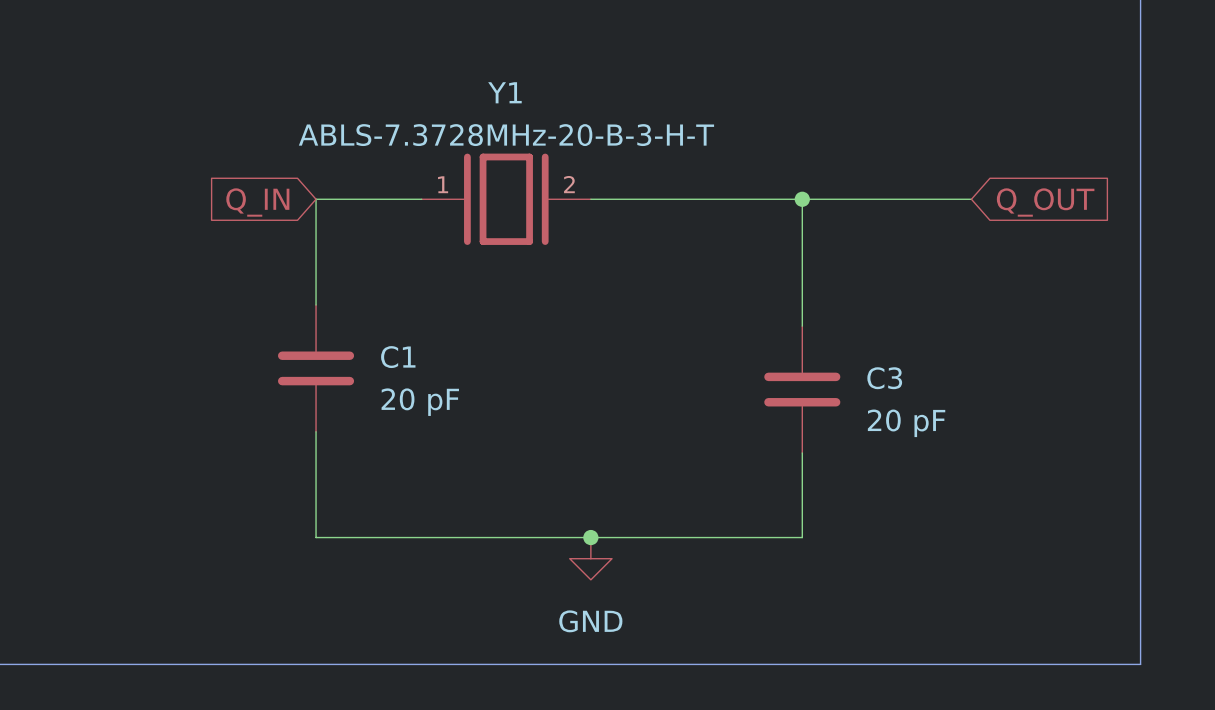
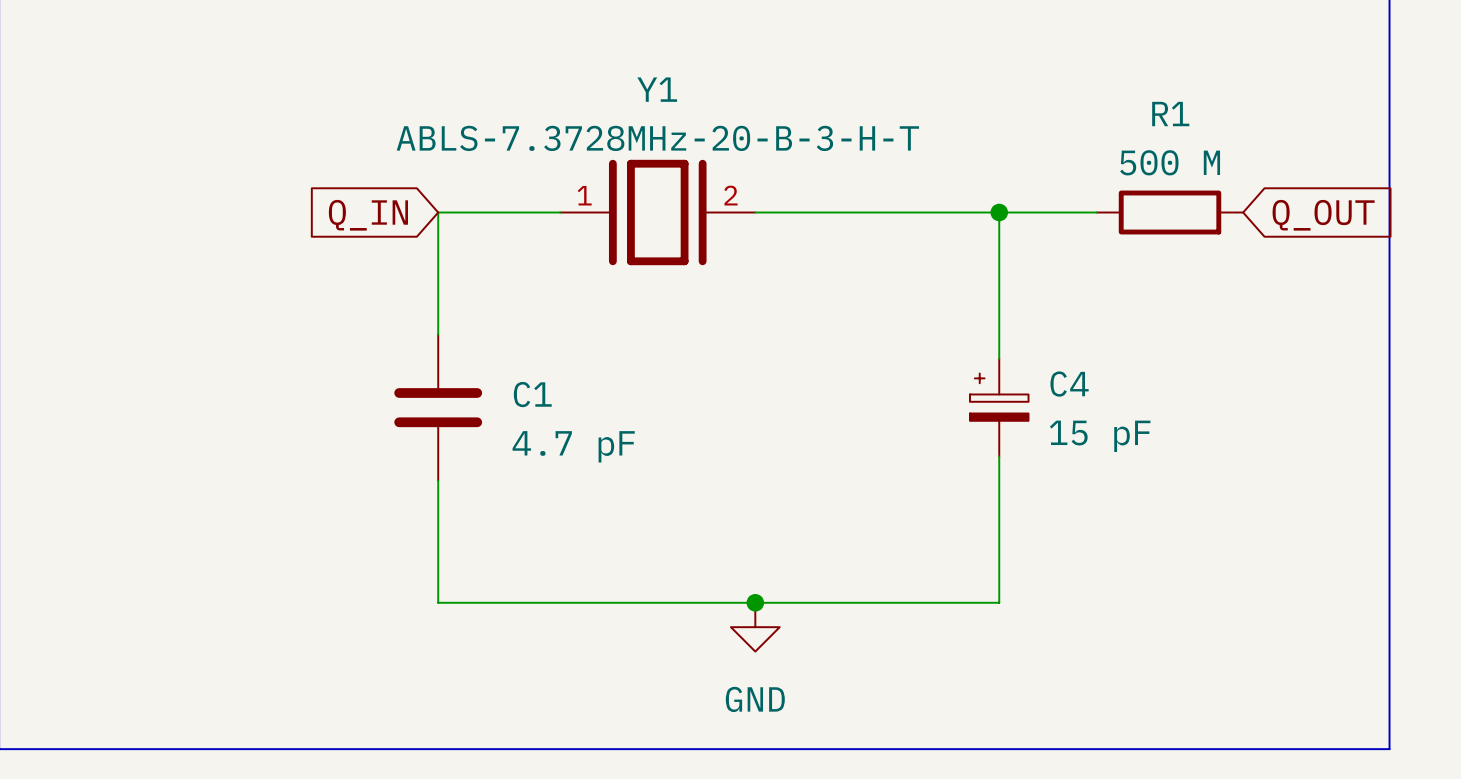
wire: (886, 199) (971, 199) -> none
R1: none -> 500 M (1169, 212)
global label position: Q_OUT (1045, 202) -> Q_OUT (1323, 215)
C4: none -> 15 pF (999, 407)
C3: 20 pF (802, 389) -> none
C1 value: 20 pF (420, 402) -> 4.7 pF (573, 446)

